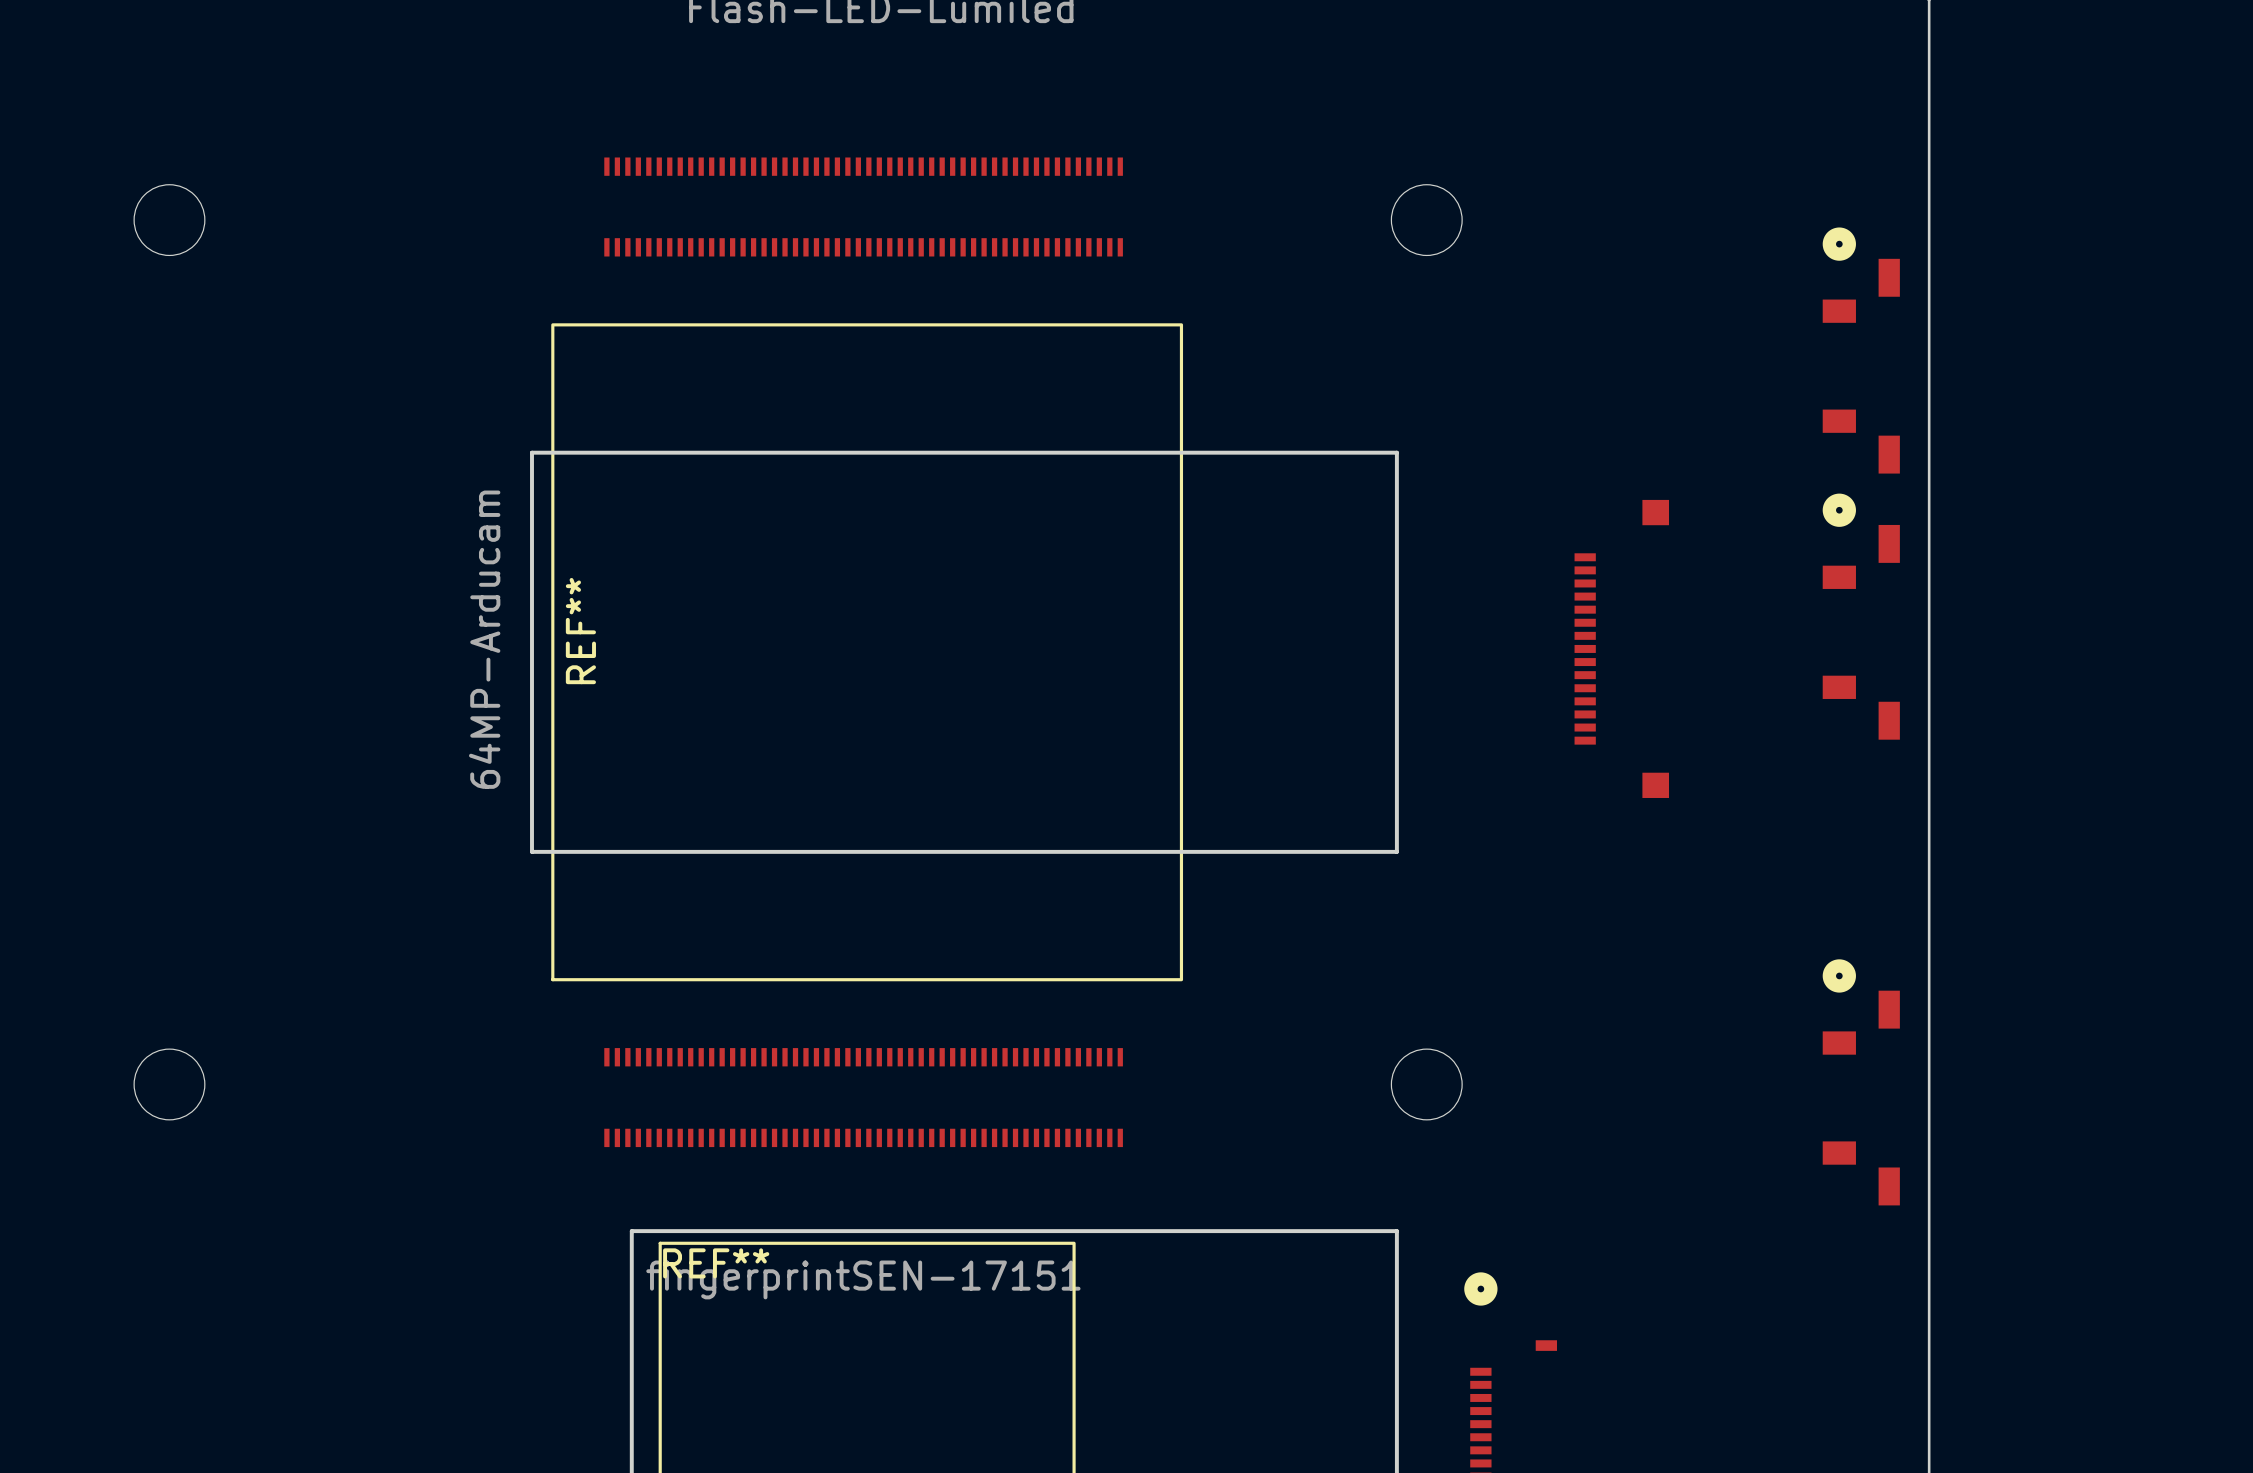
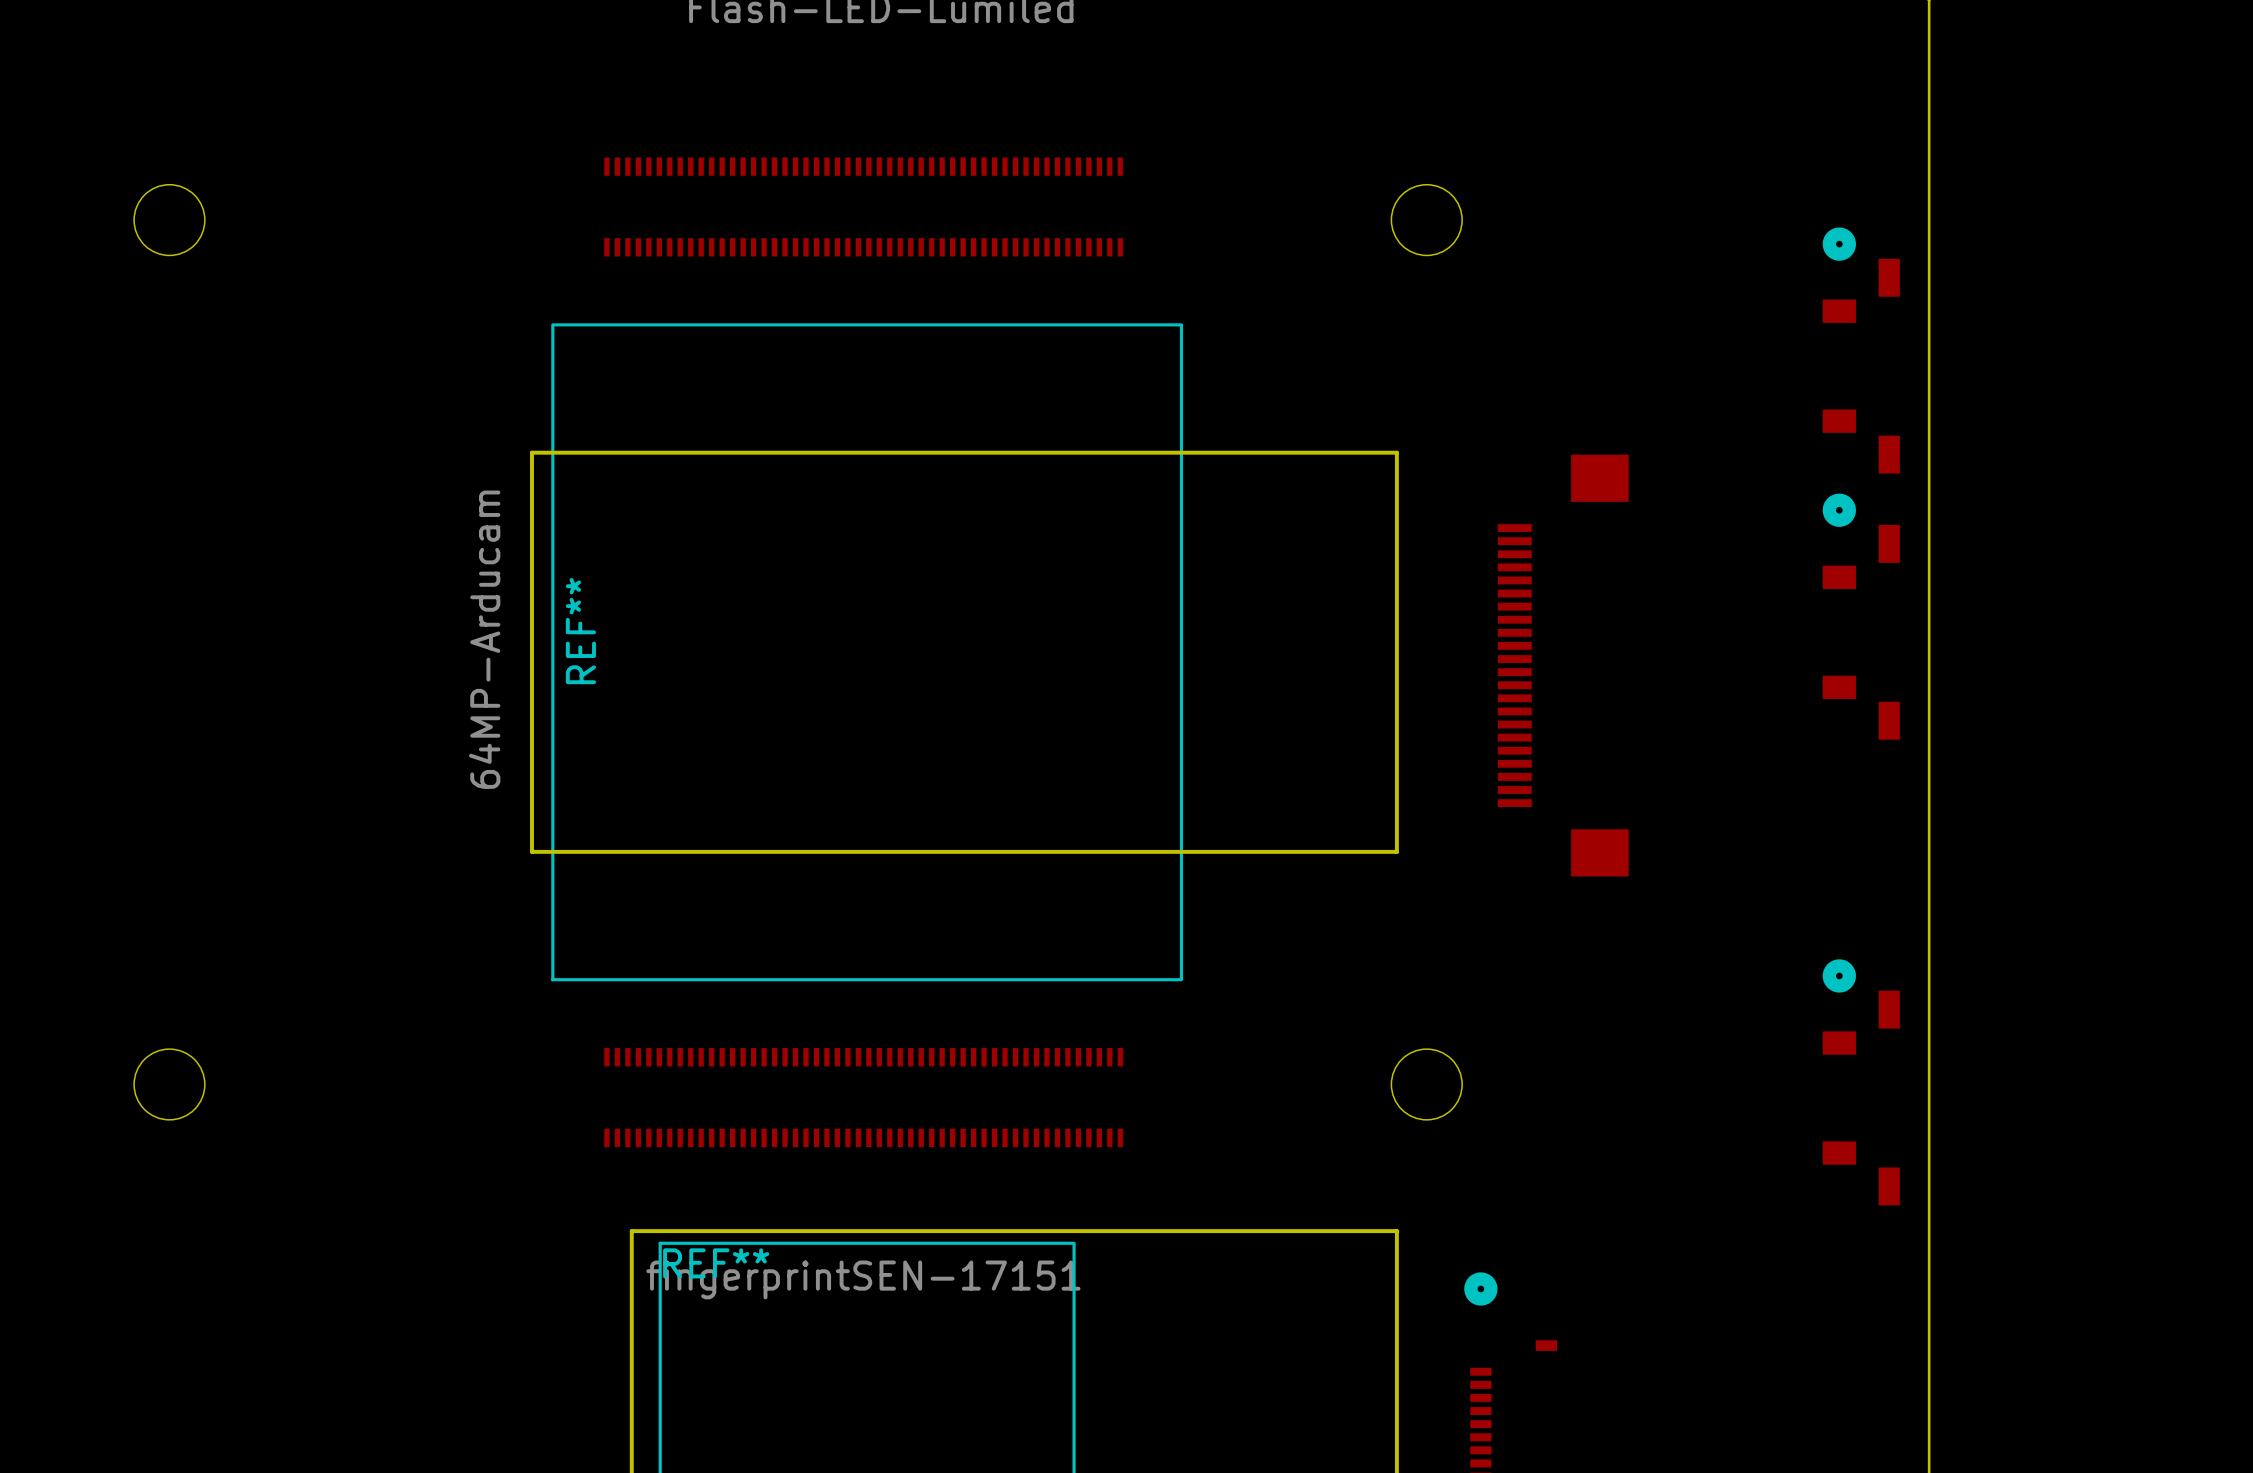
part: (1621, 648) -> none
part: none -> (1563, 665)

